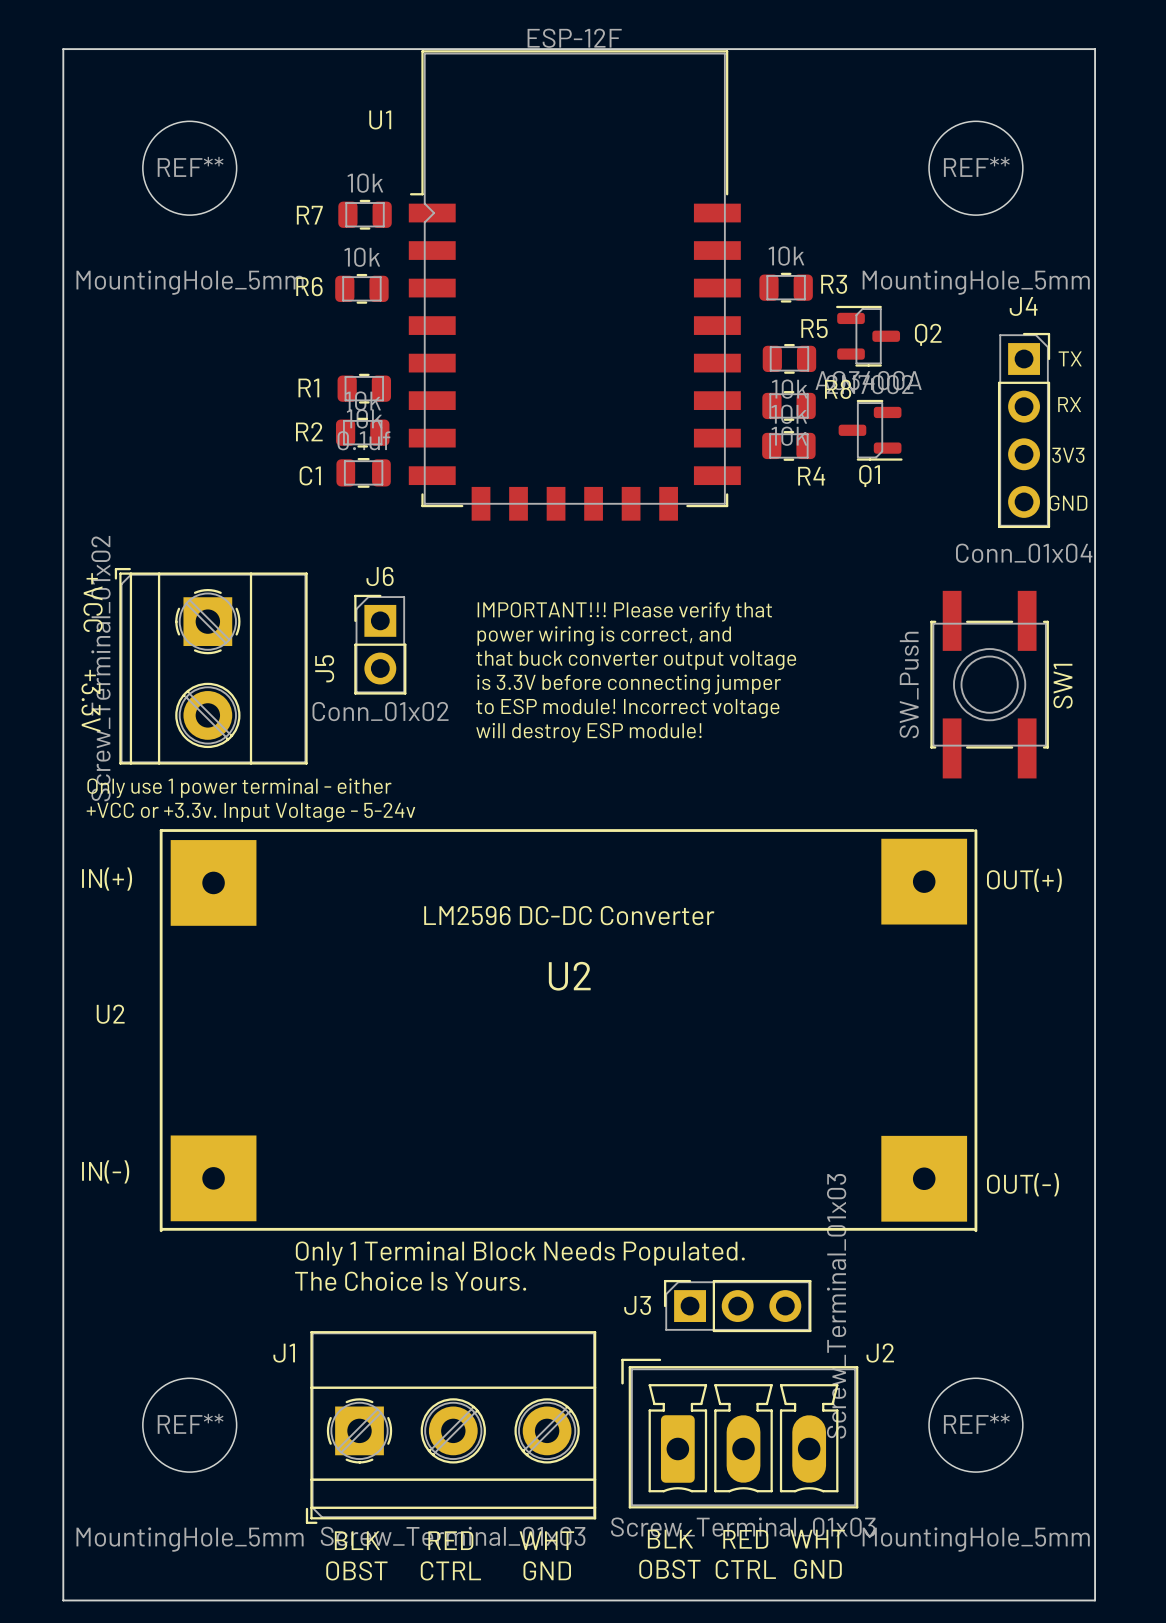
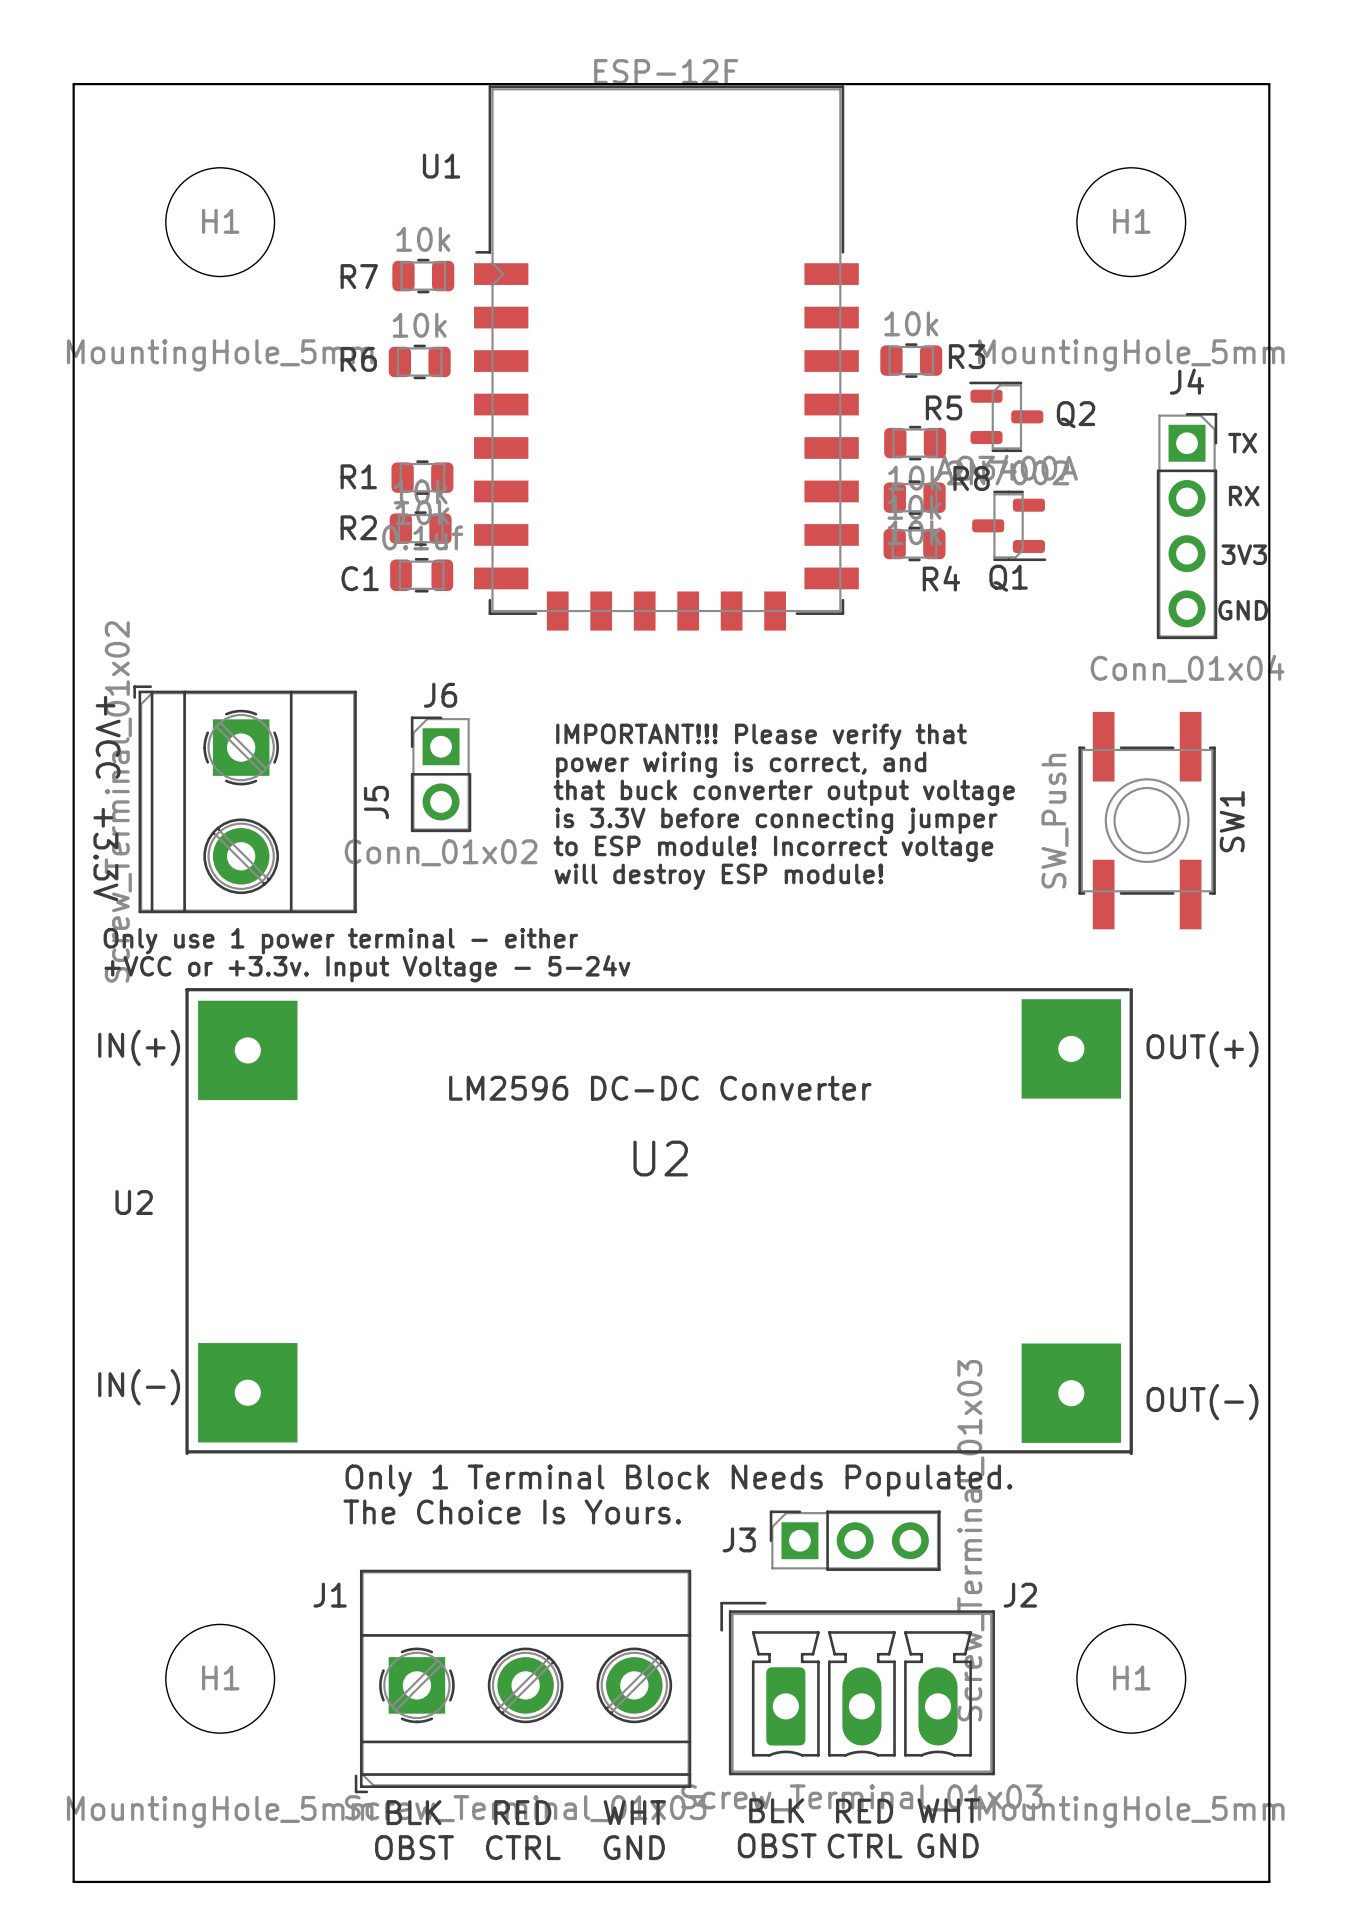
REF** name: REF** (190, 166) -> H1 (220, 221)
REF** name: REF** (976, 166) -> H1 (1131, 221)
REF** name: REF** (190, 1423) -> H1 (220, 1677)
REF** name: REF** (976, 1423) -> H1 (1131, 1677)

